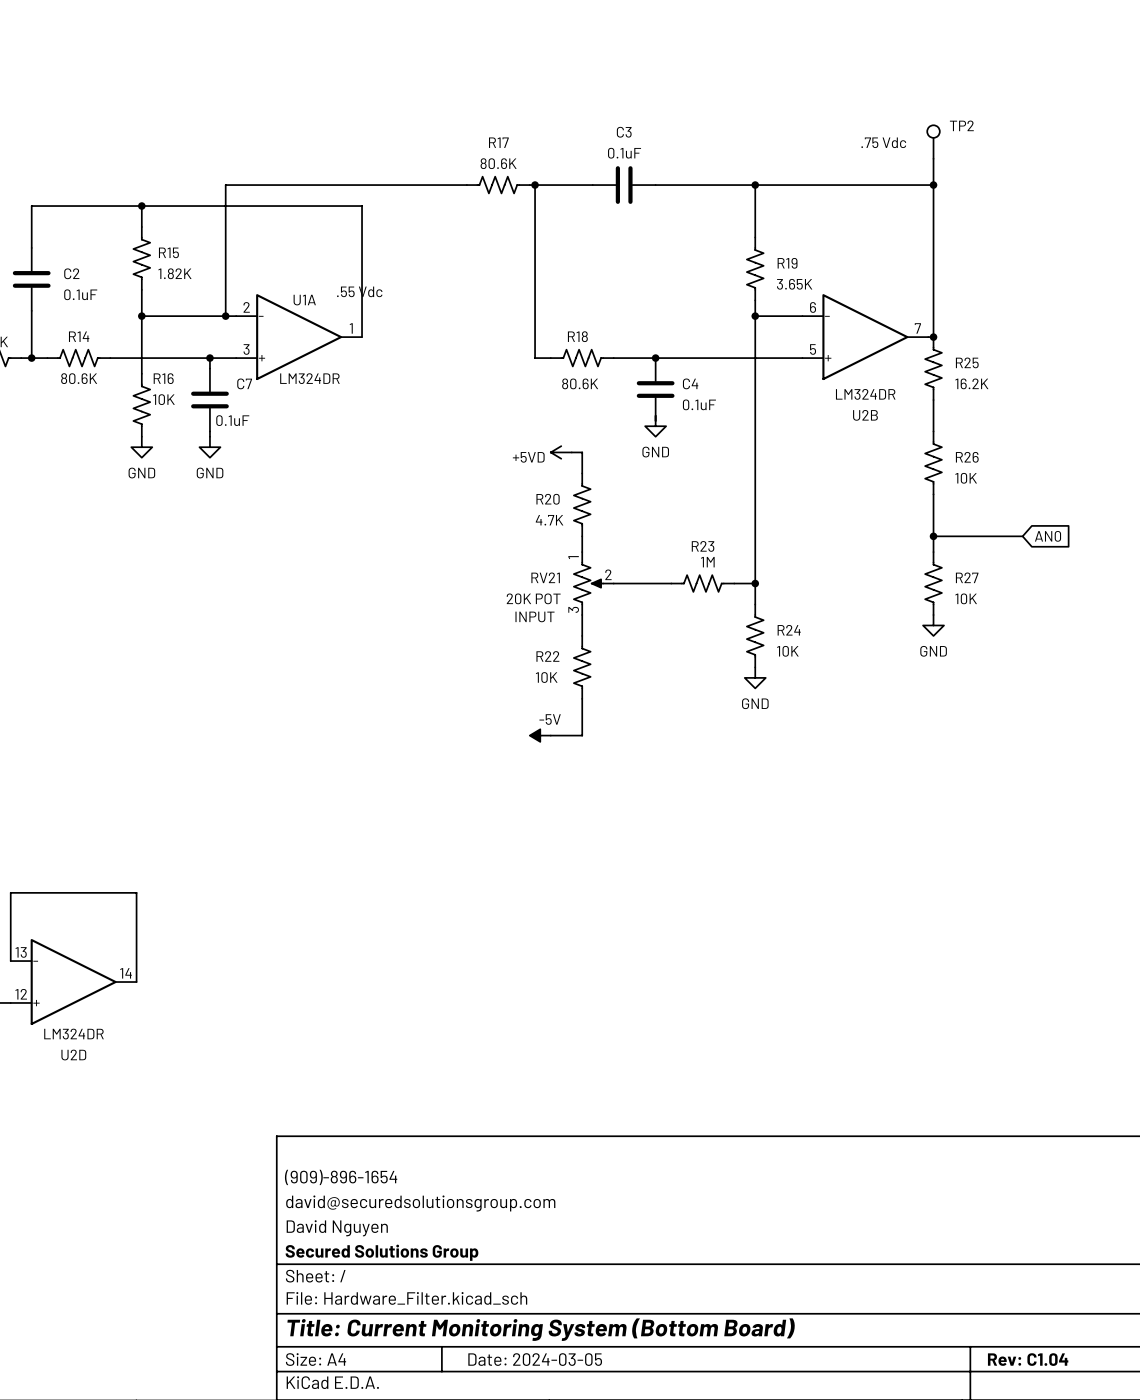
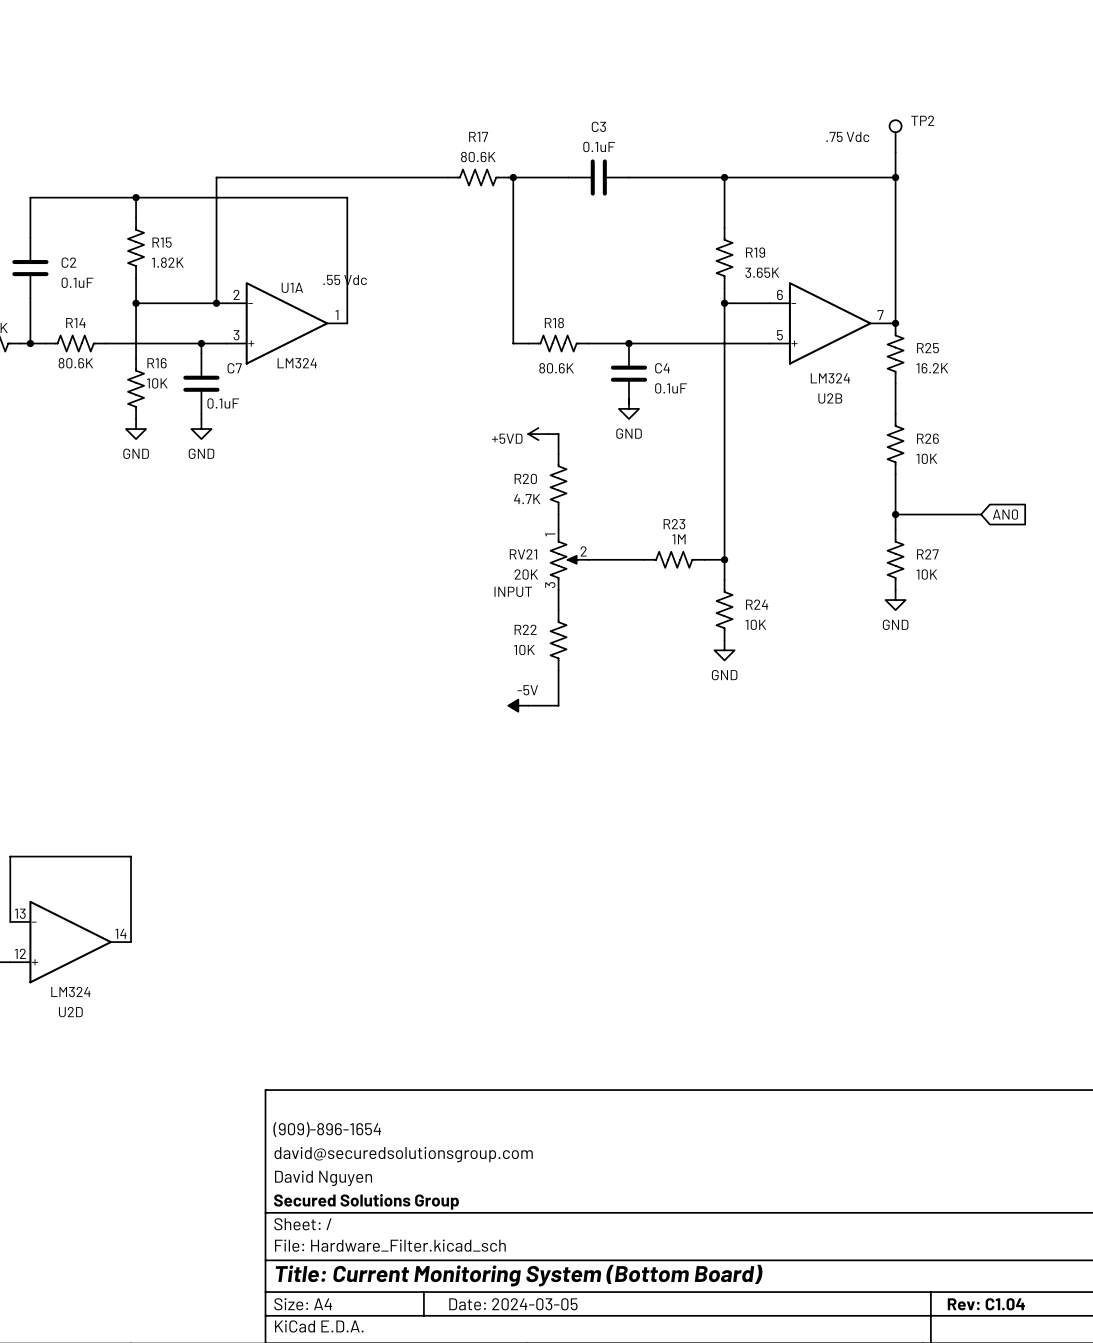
U1A value: LM324DR (309, 378) -> LM324 (297, 363)
U2B value: LM324DR (865, 394) -> LM324 (830, 378)
RV21 value: 20K POT (533, 598) -> 20K (526, 574)
U2D value: LM324DR (73, 1034) -> LM324 (70, 992)

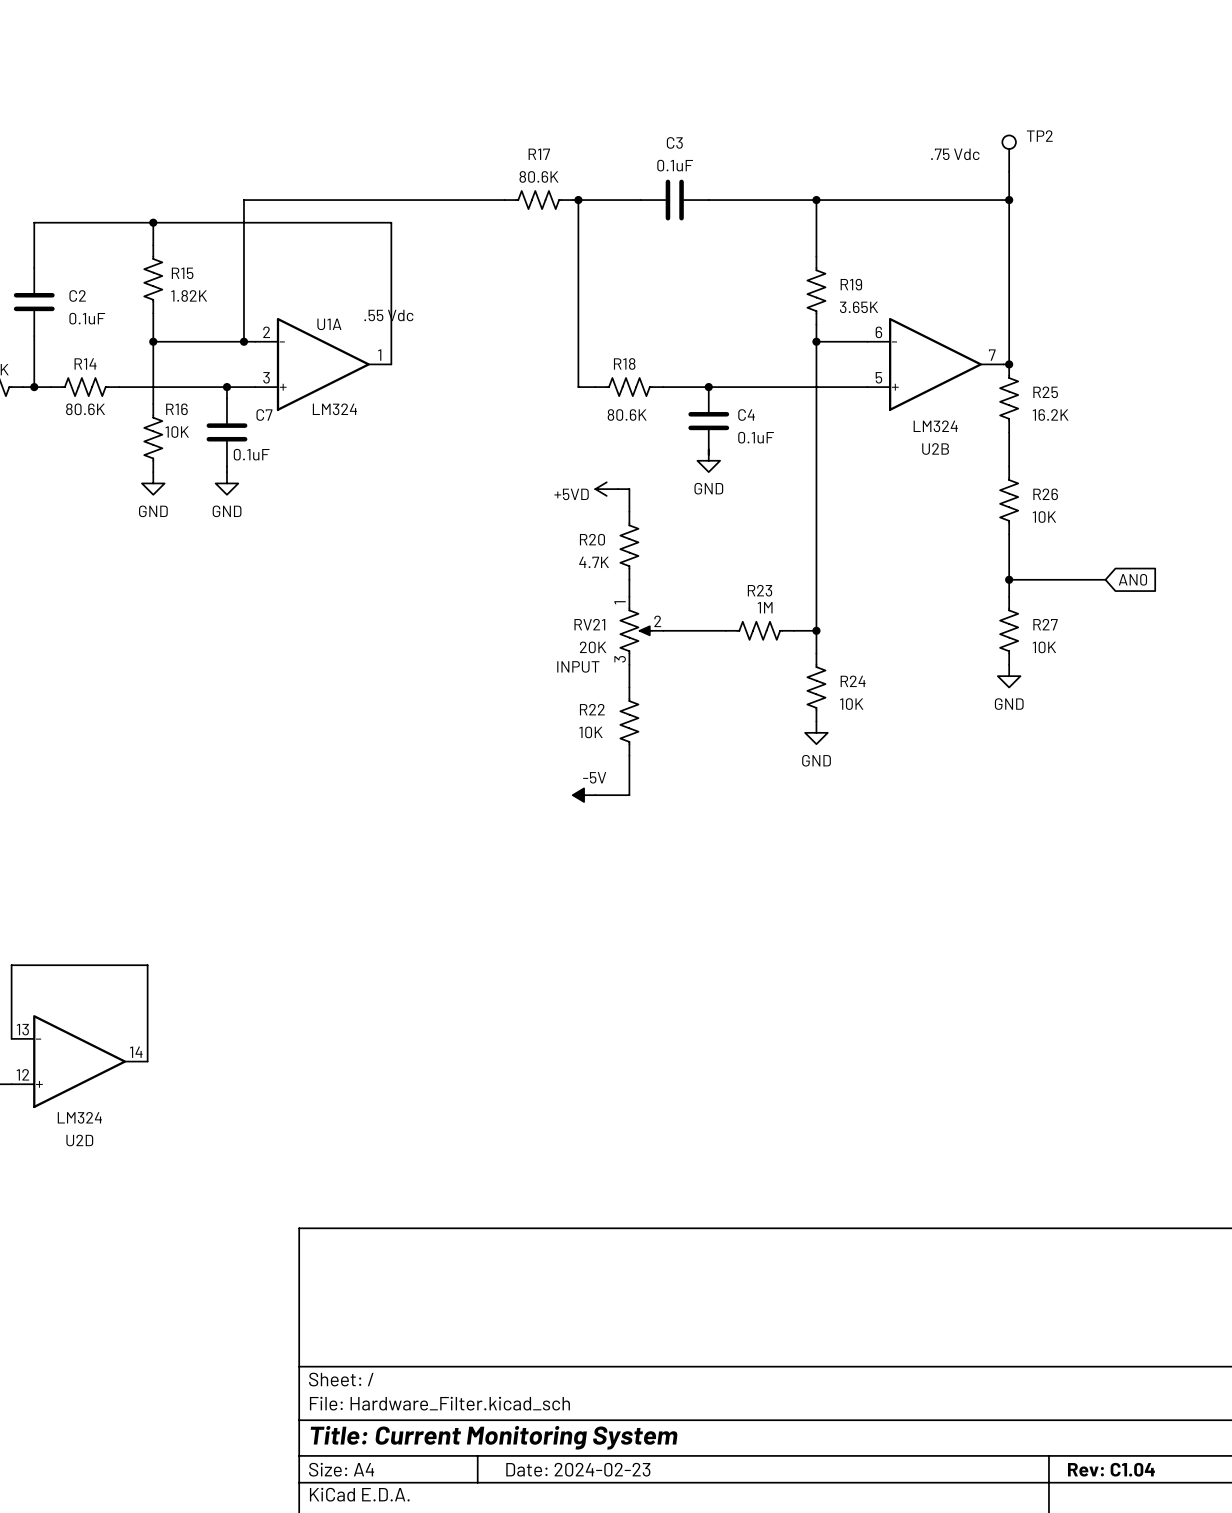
title block: (909)-896-1654 (327, 1129) -> none
title block: david@securedsolutionsgroup.com (403, 1154) -> none
title block: David Nguyen (323, 1178) -> none
title block: Secured Solutions Group (366, 1201) -> none
title block: Title: Current Monitoring System (Bottom Board) (519, 1275) -> Title: Current Monitoring System (494, 1437)
title block: Date: 2024-03-05 (513, 1304) -> Date: 2024-02-23 (578, 1469)

